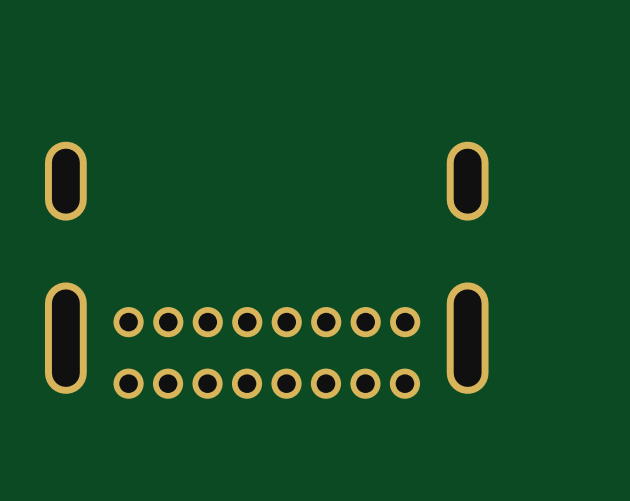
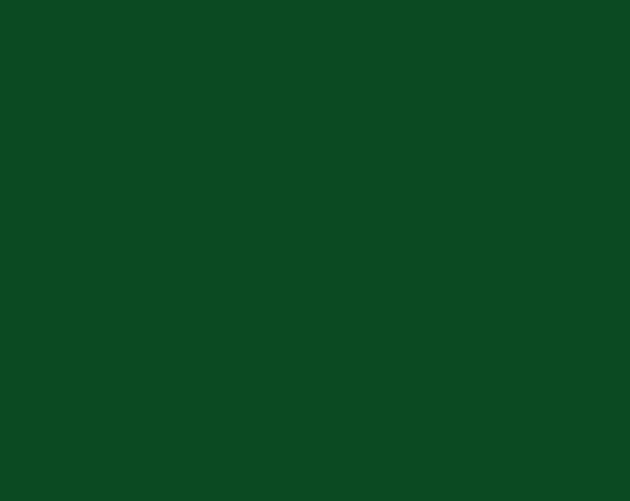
part: (266, 270) -> none

